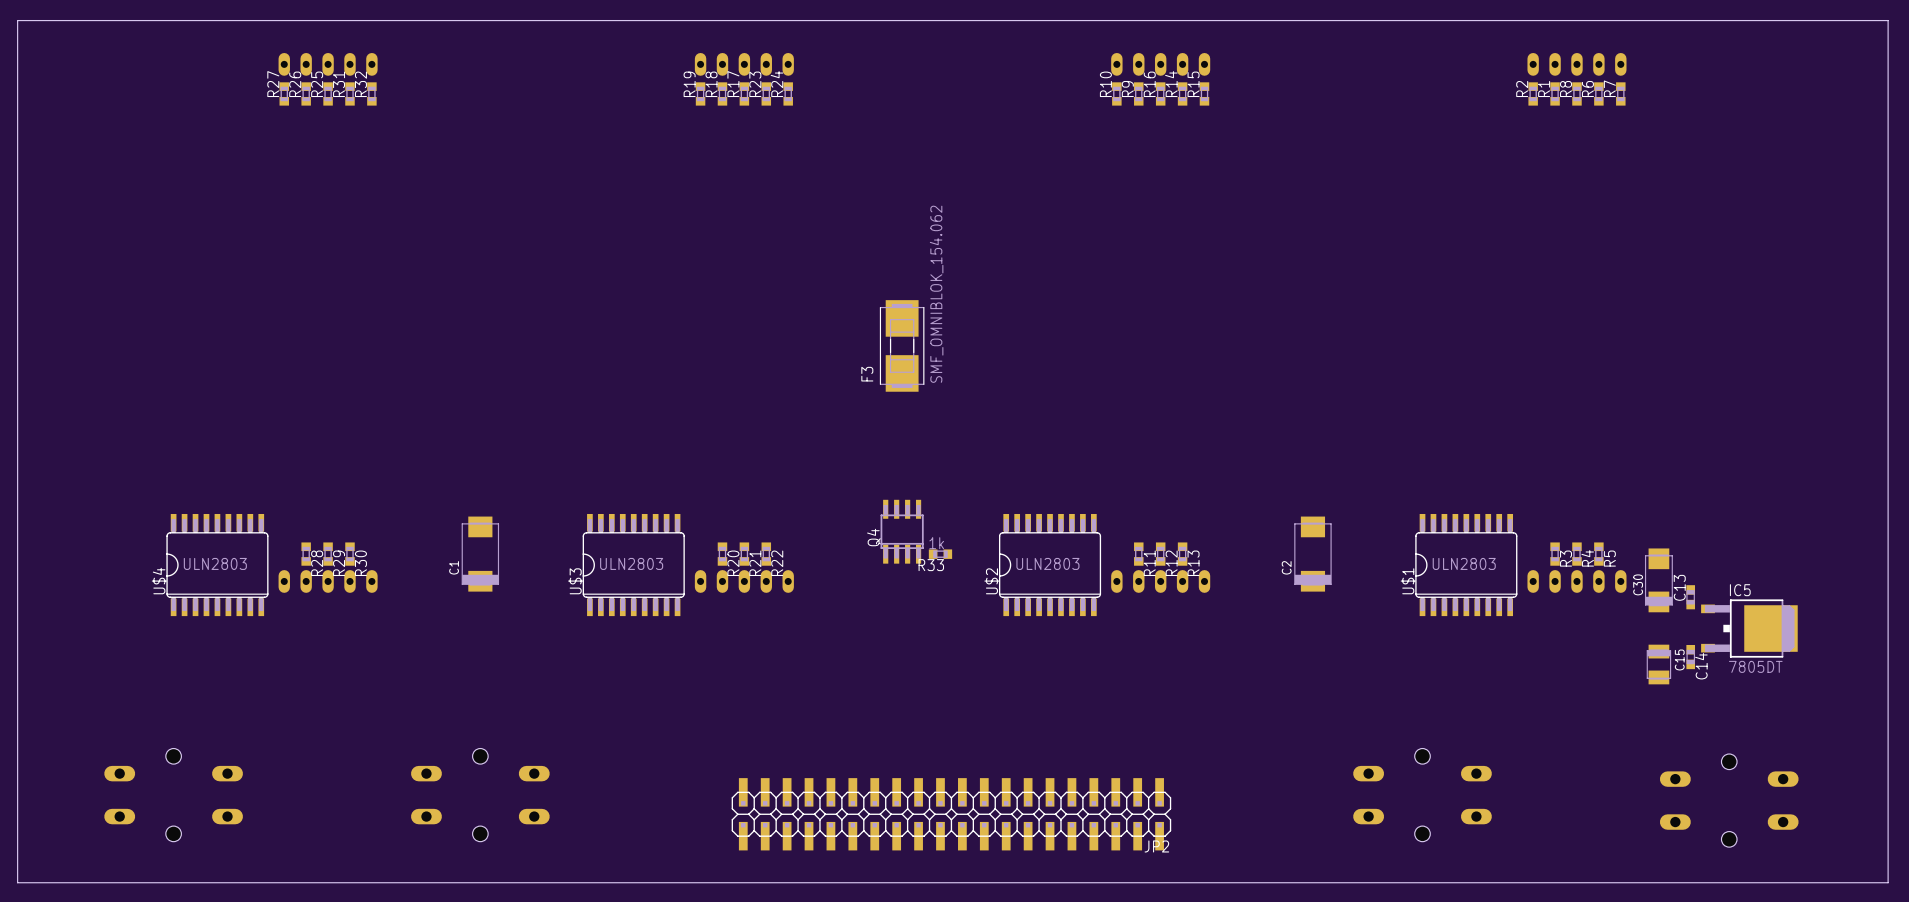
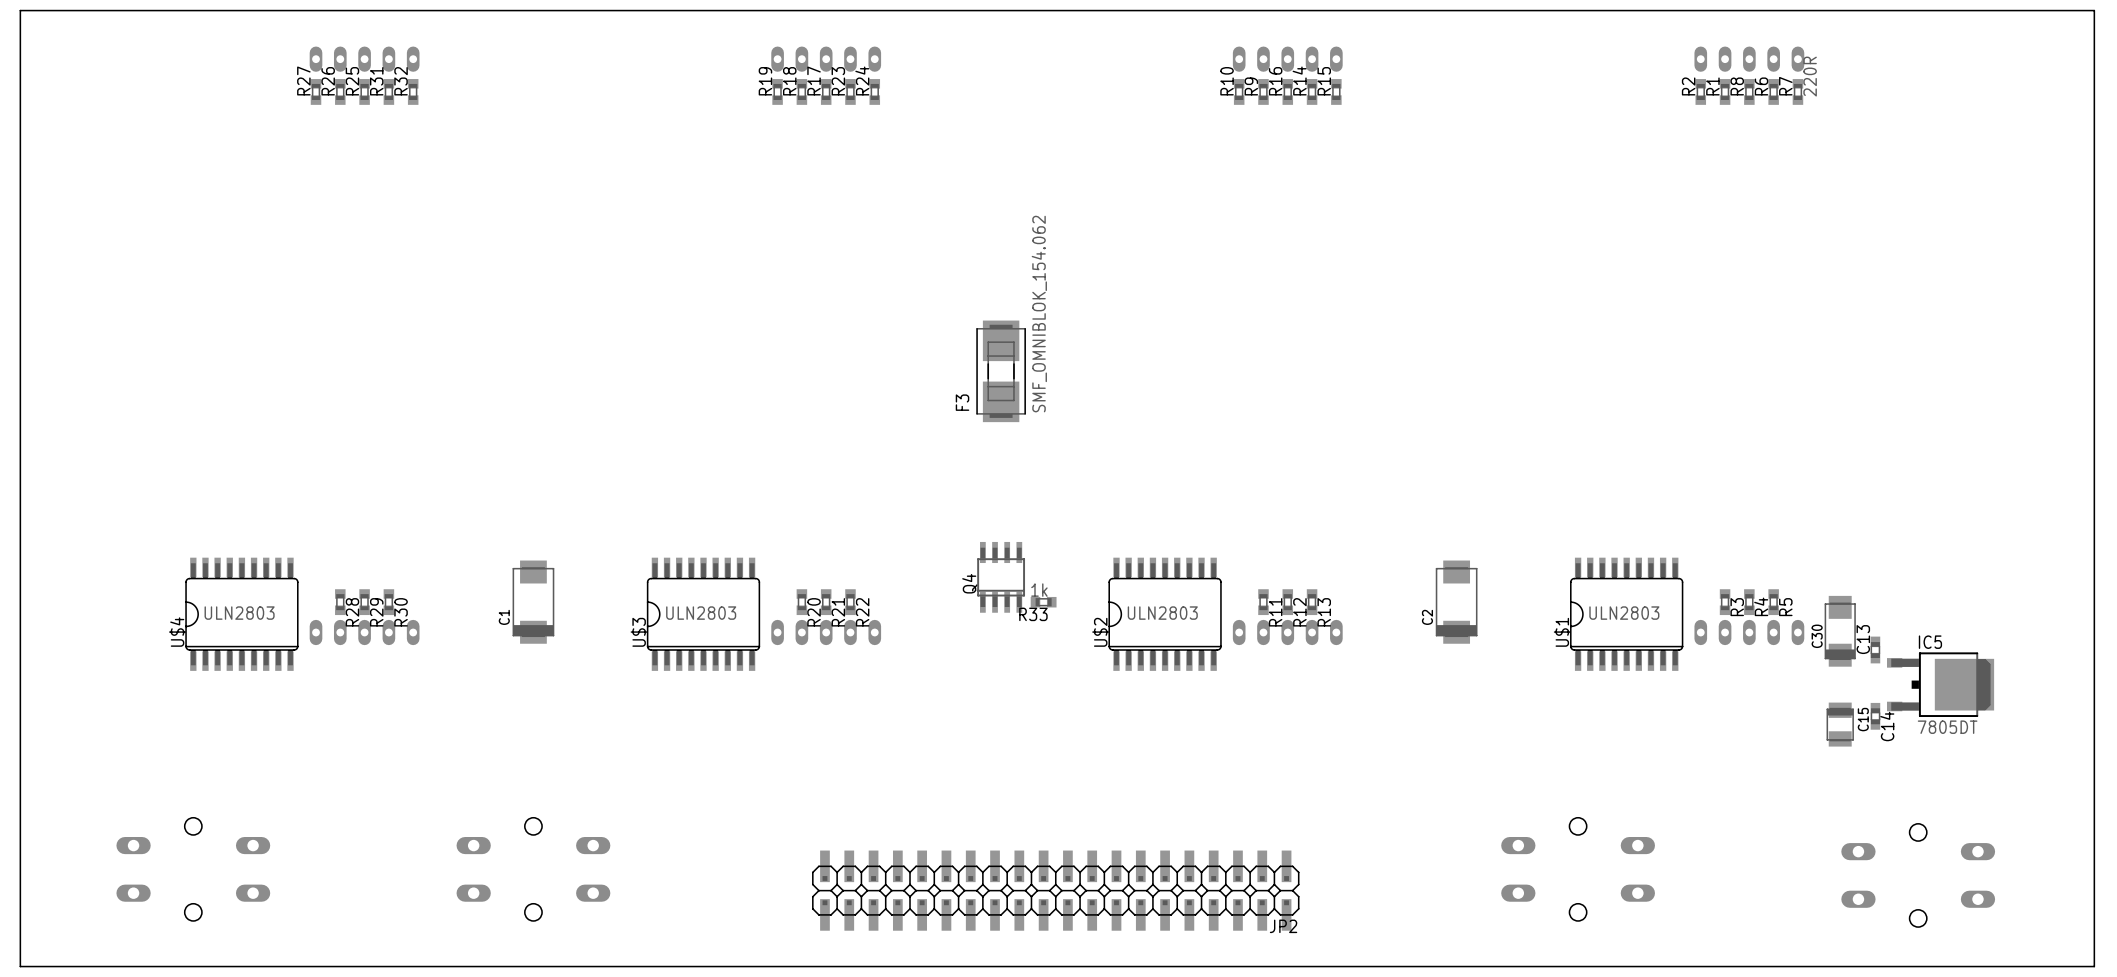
R7 value: none -> 220R (1810, 76)

